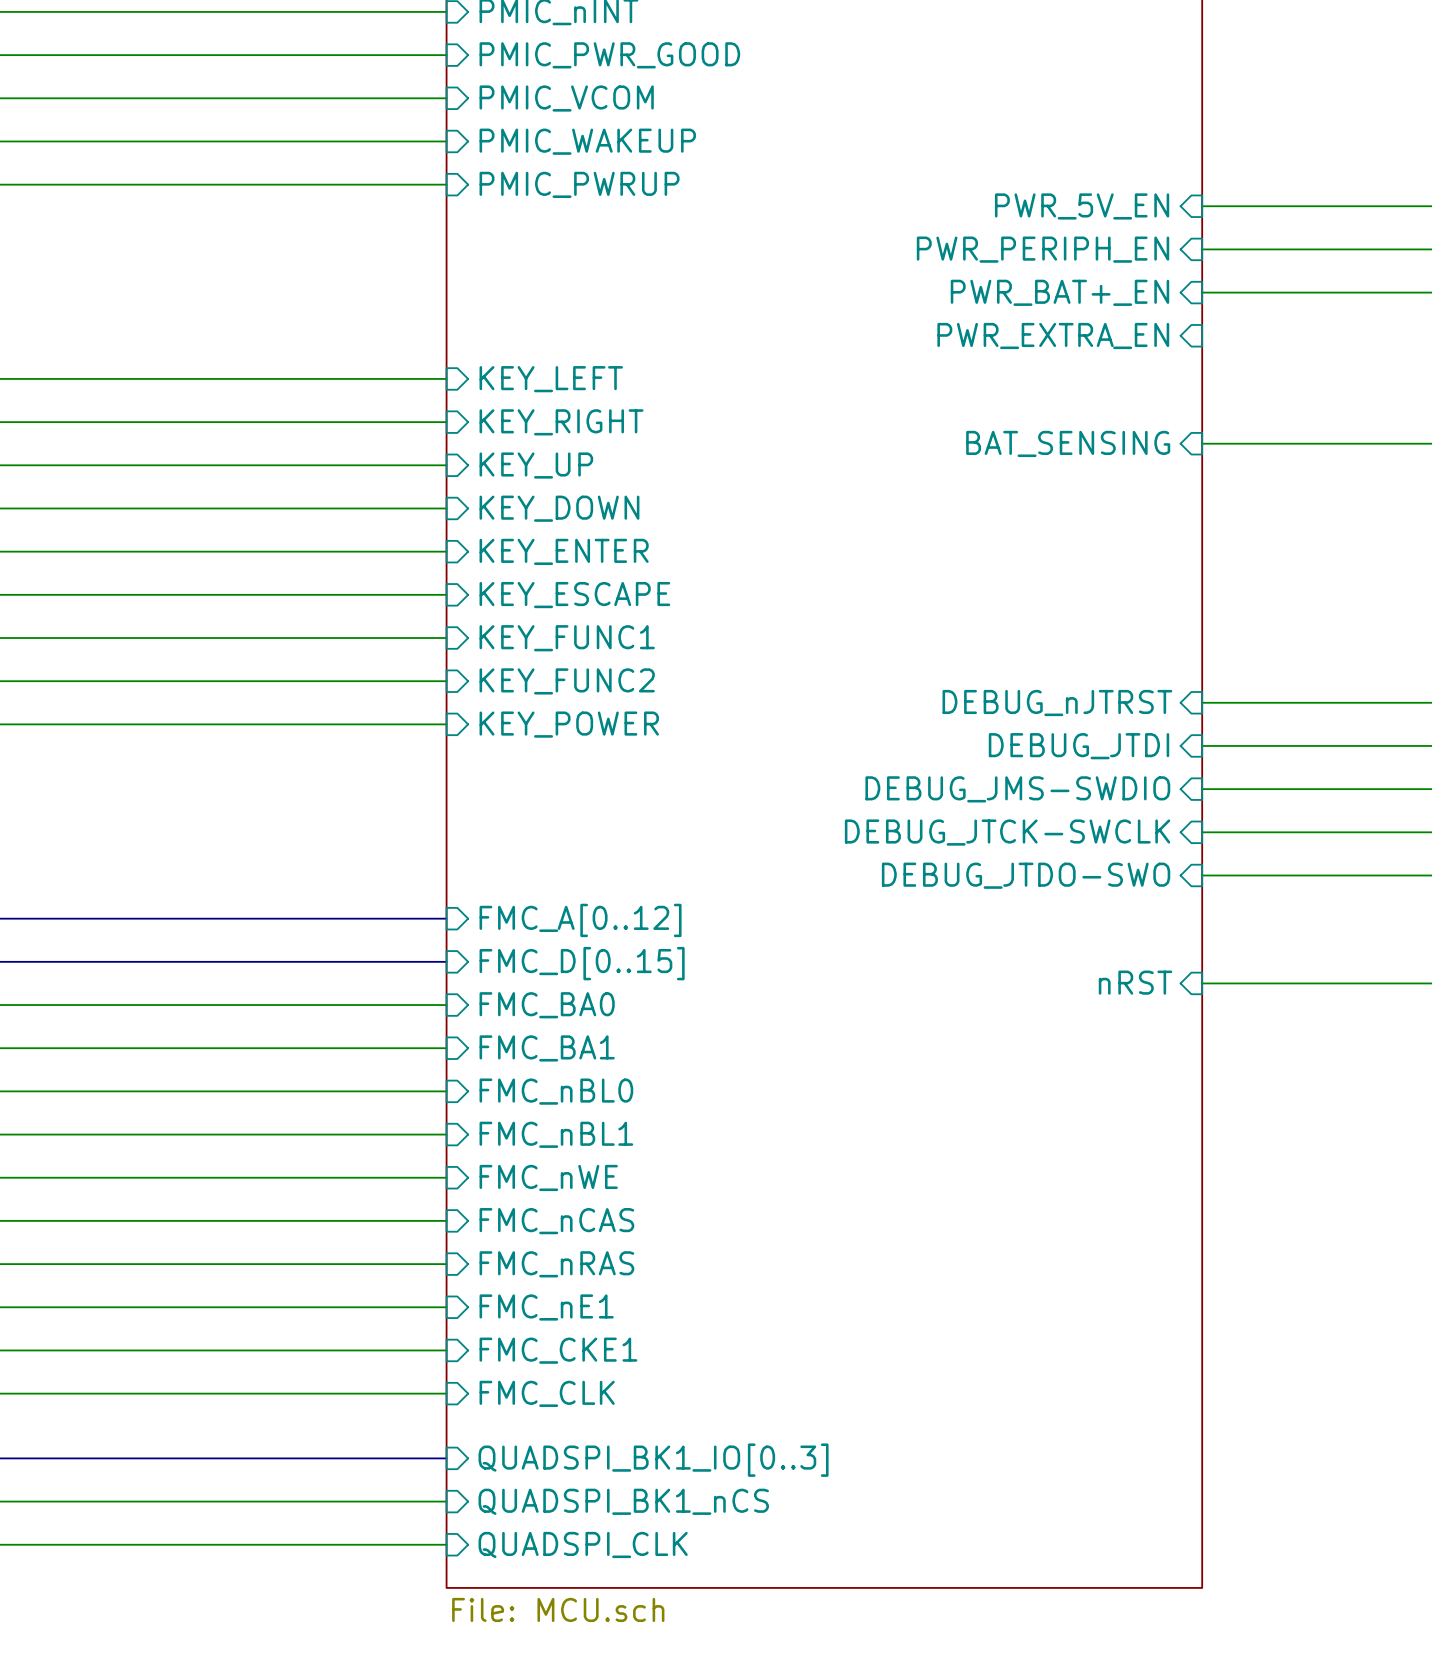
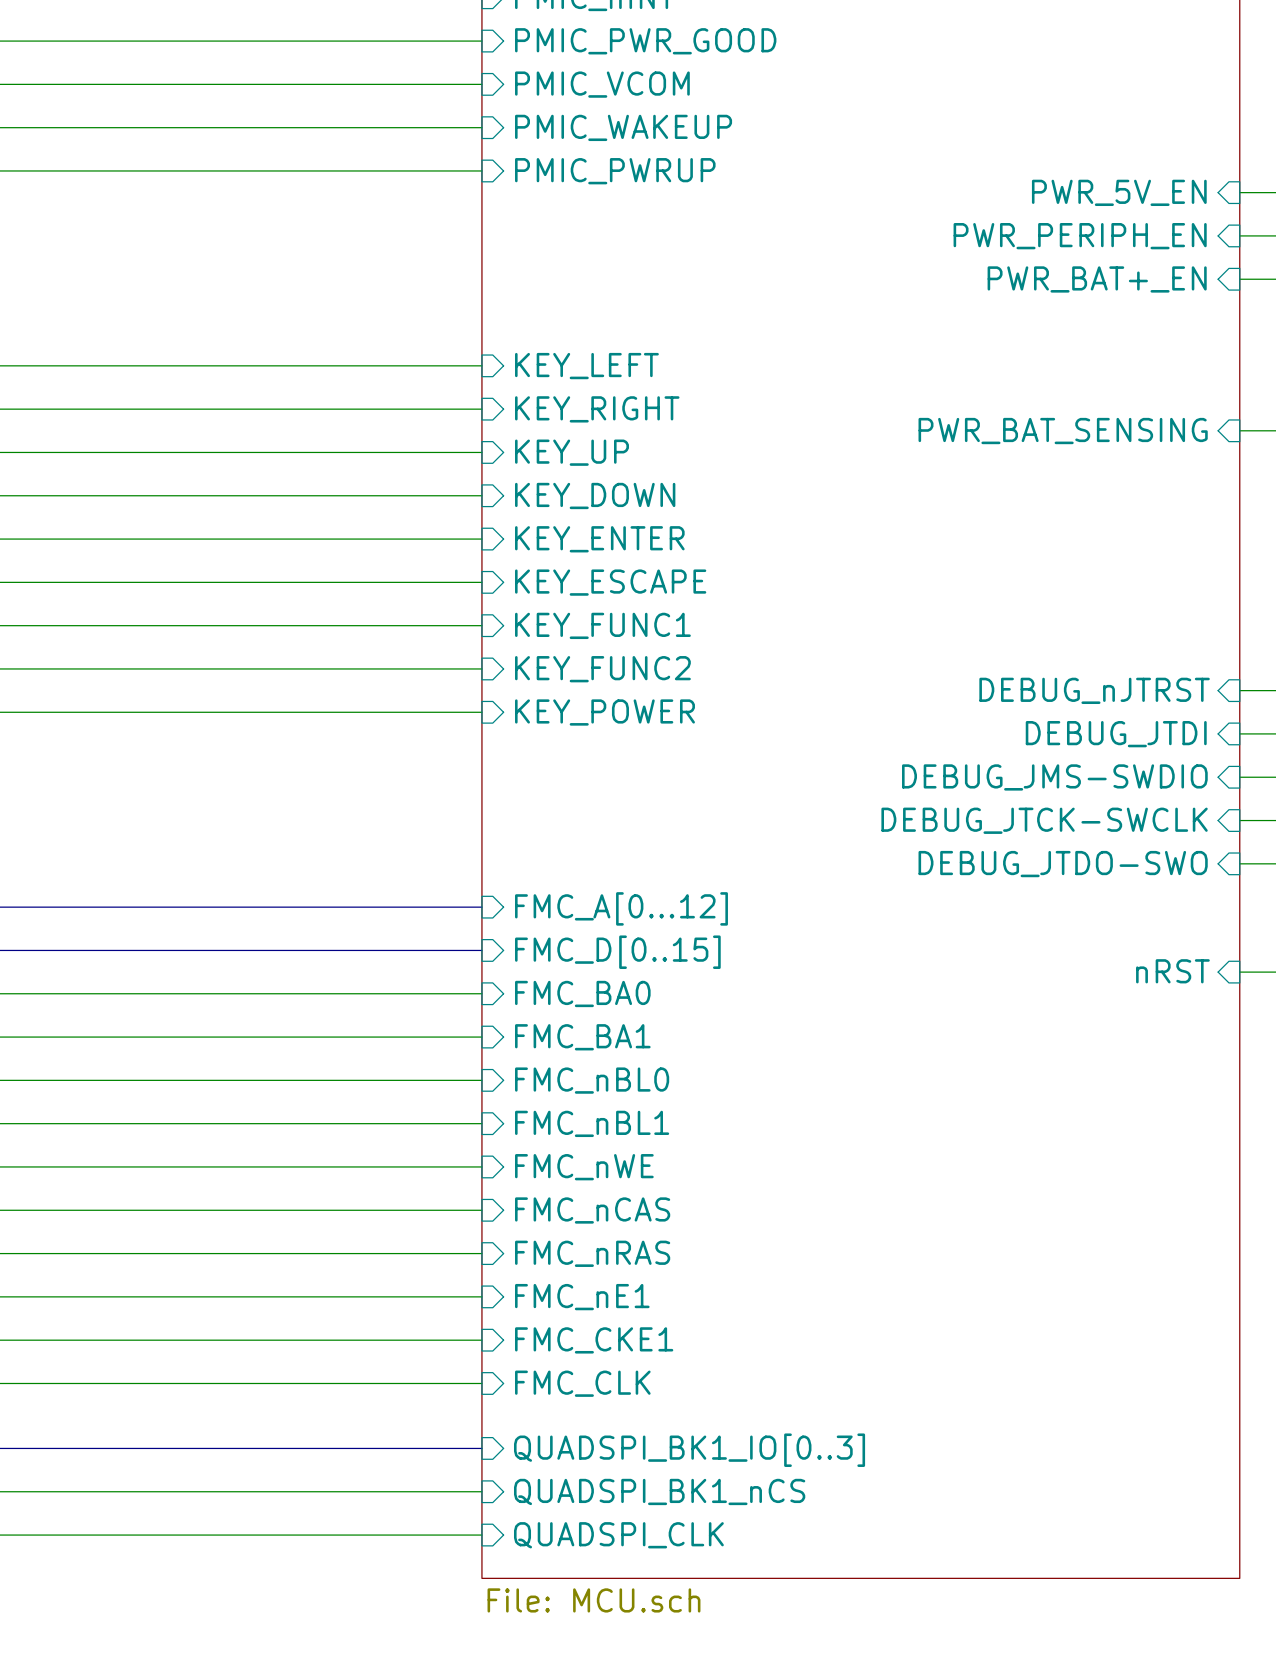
sheet pin: PWR_EXTRA_EN (1053, 335) -> none
sheet pin: BAT_SENSING (1068, 443) -> PWR_BAT_SENSING (1063, 431)
sheet pin: FMC_A[0..12] (580, 920) -> FMC_A[0...12] (621, 908)

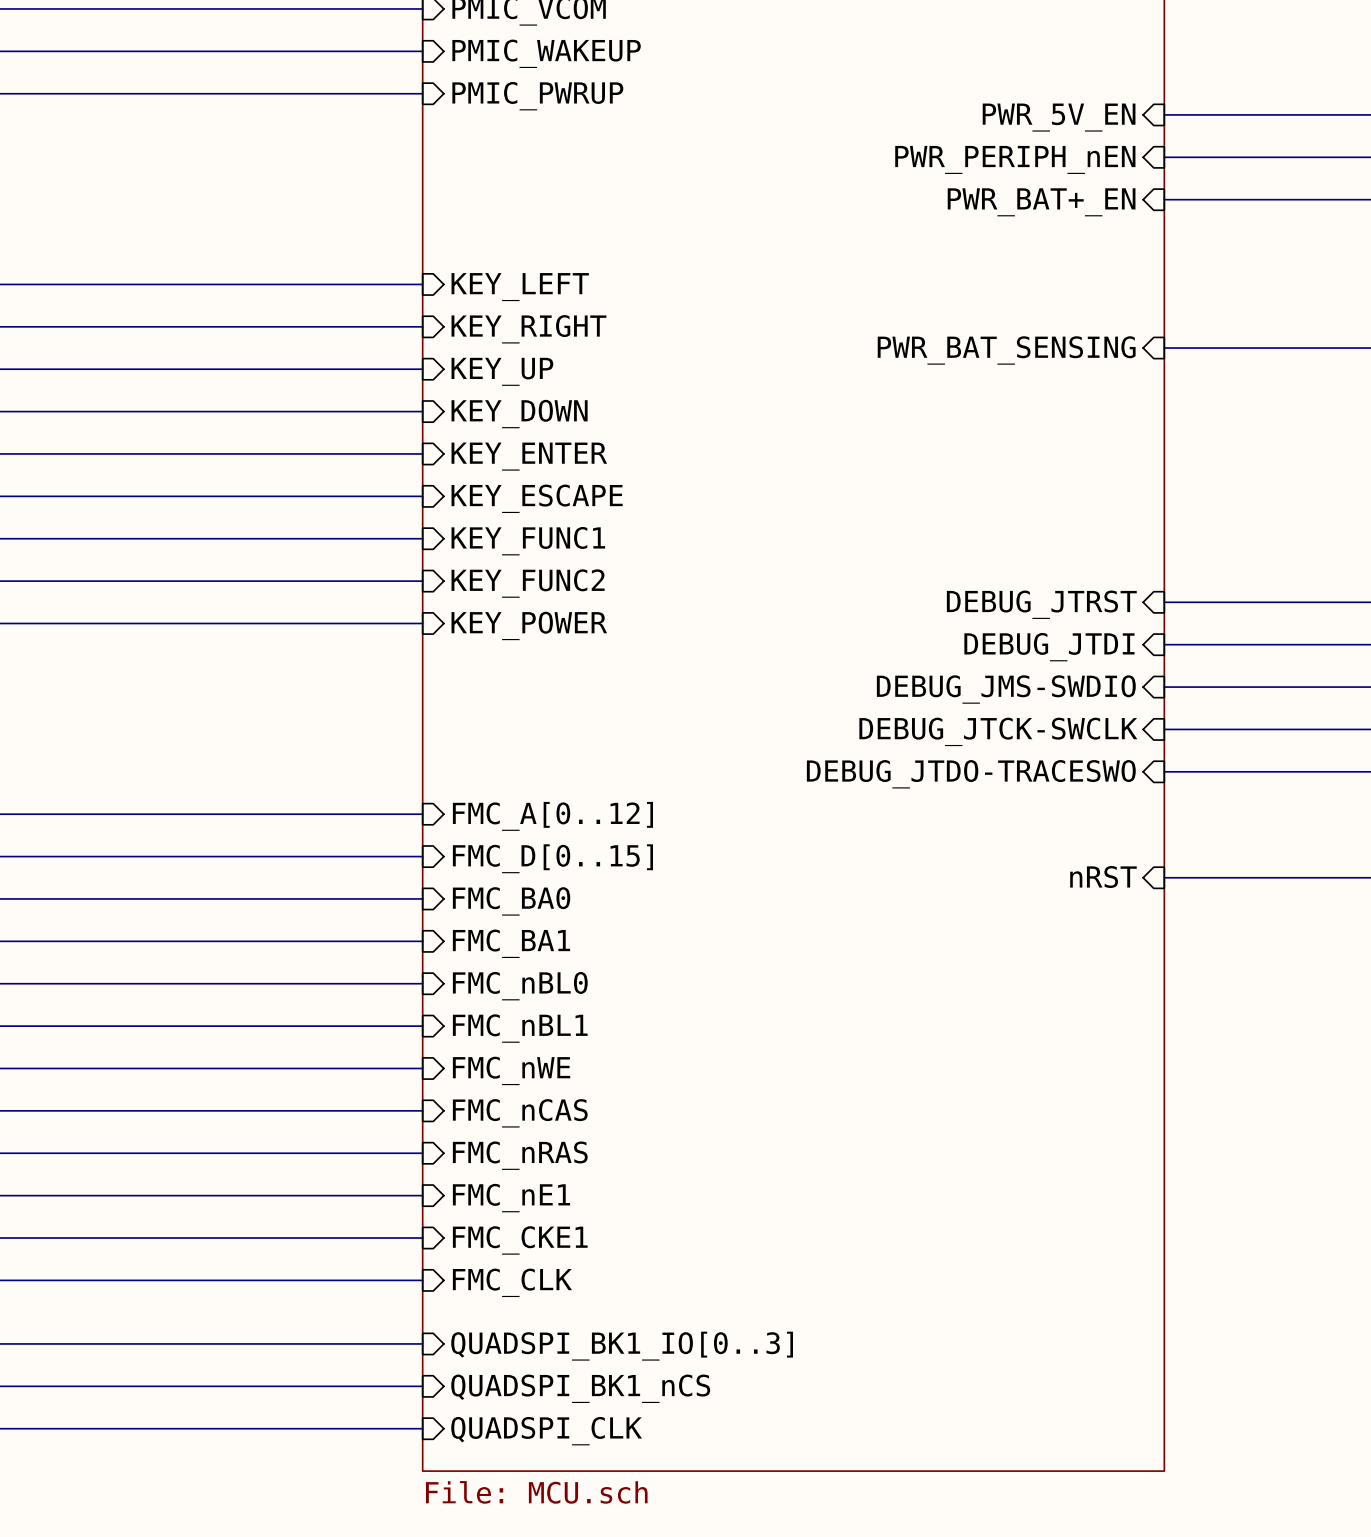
sheet pin: PWR_PERIPH_EN (1080, 236) -> PWR_PERIPH_nEN (1015, 159)
sheet pin: DEBUG_nJTRST (1094, 690) -> DEBUG_JTRST (1041, 604)
sheet pin: DEBUG_JTDO-SWO (1063, 864) -> DEBUG_JTDO-TRACESWO (971, 774)
sheet pin: FMC_A[0...12] (621, 908) -> FMC_A[0..12] (552, 816)

